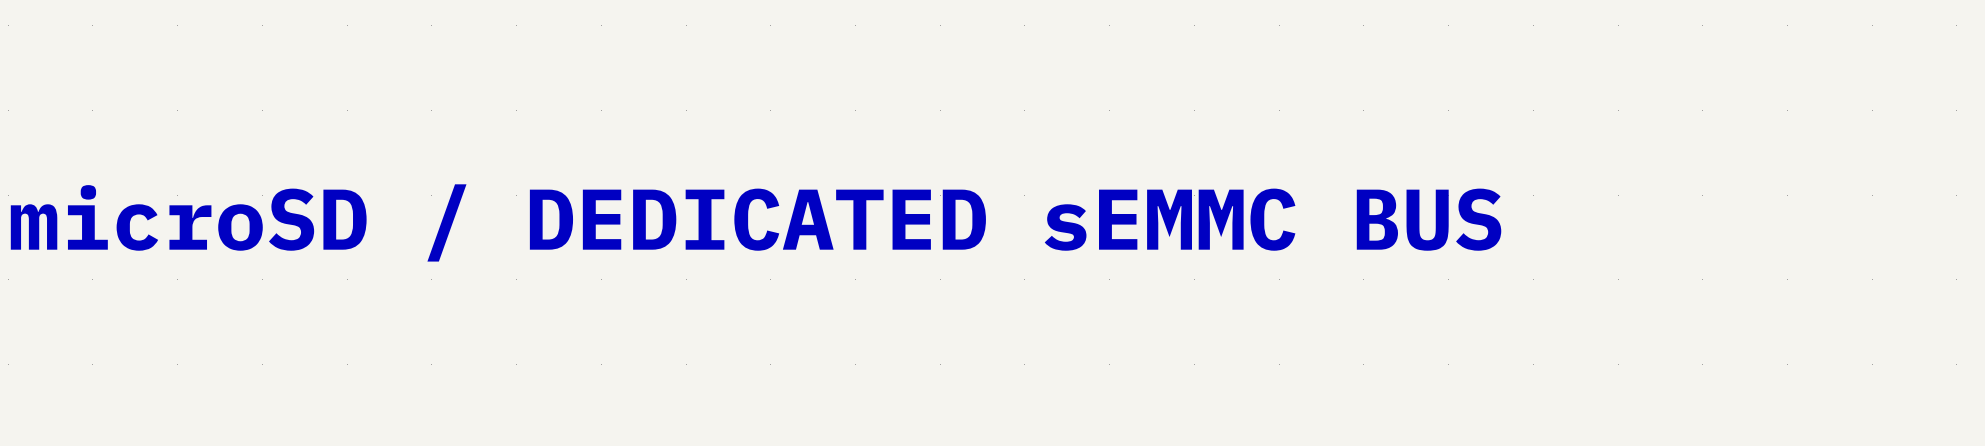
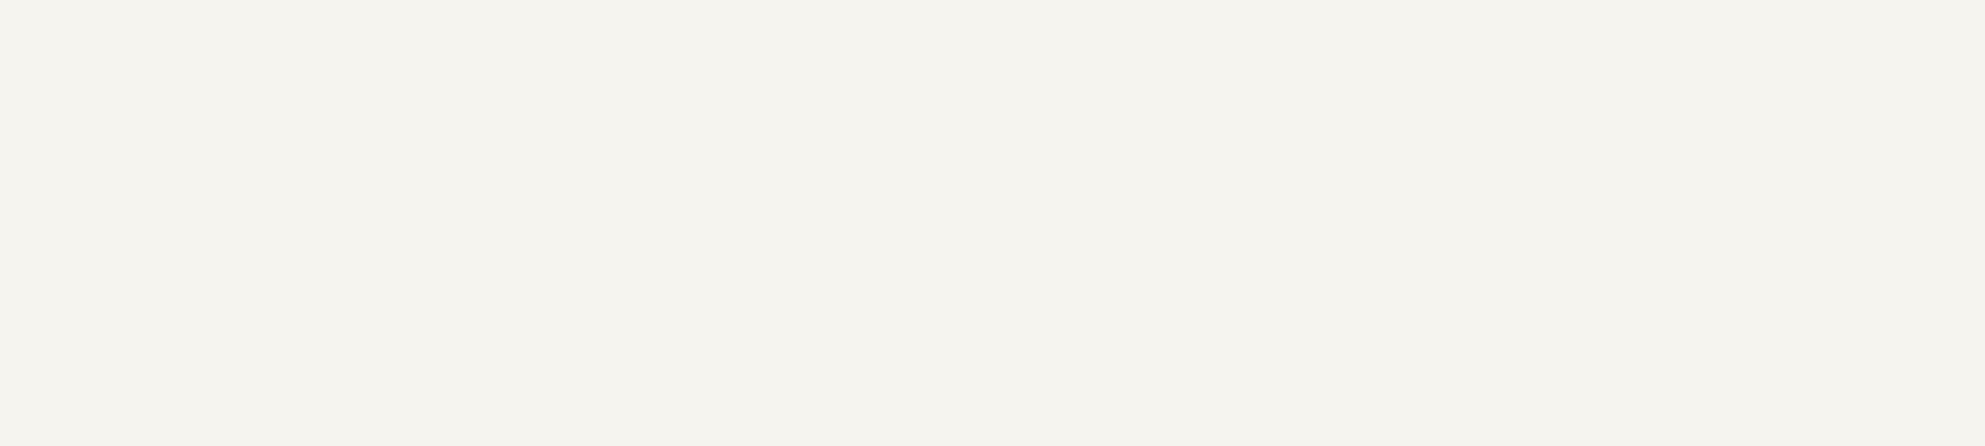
text: microSD / DEDICATED sEMMC BUS (756, 222) -> none

